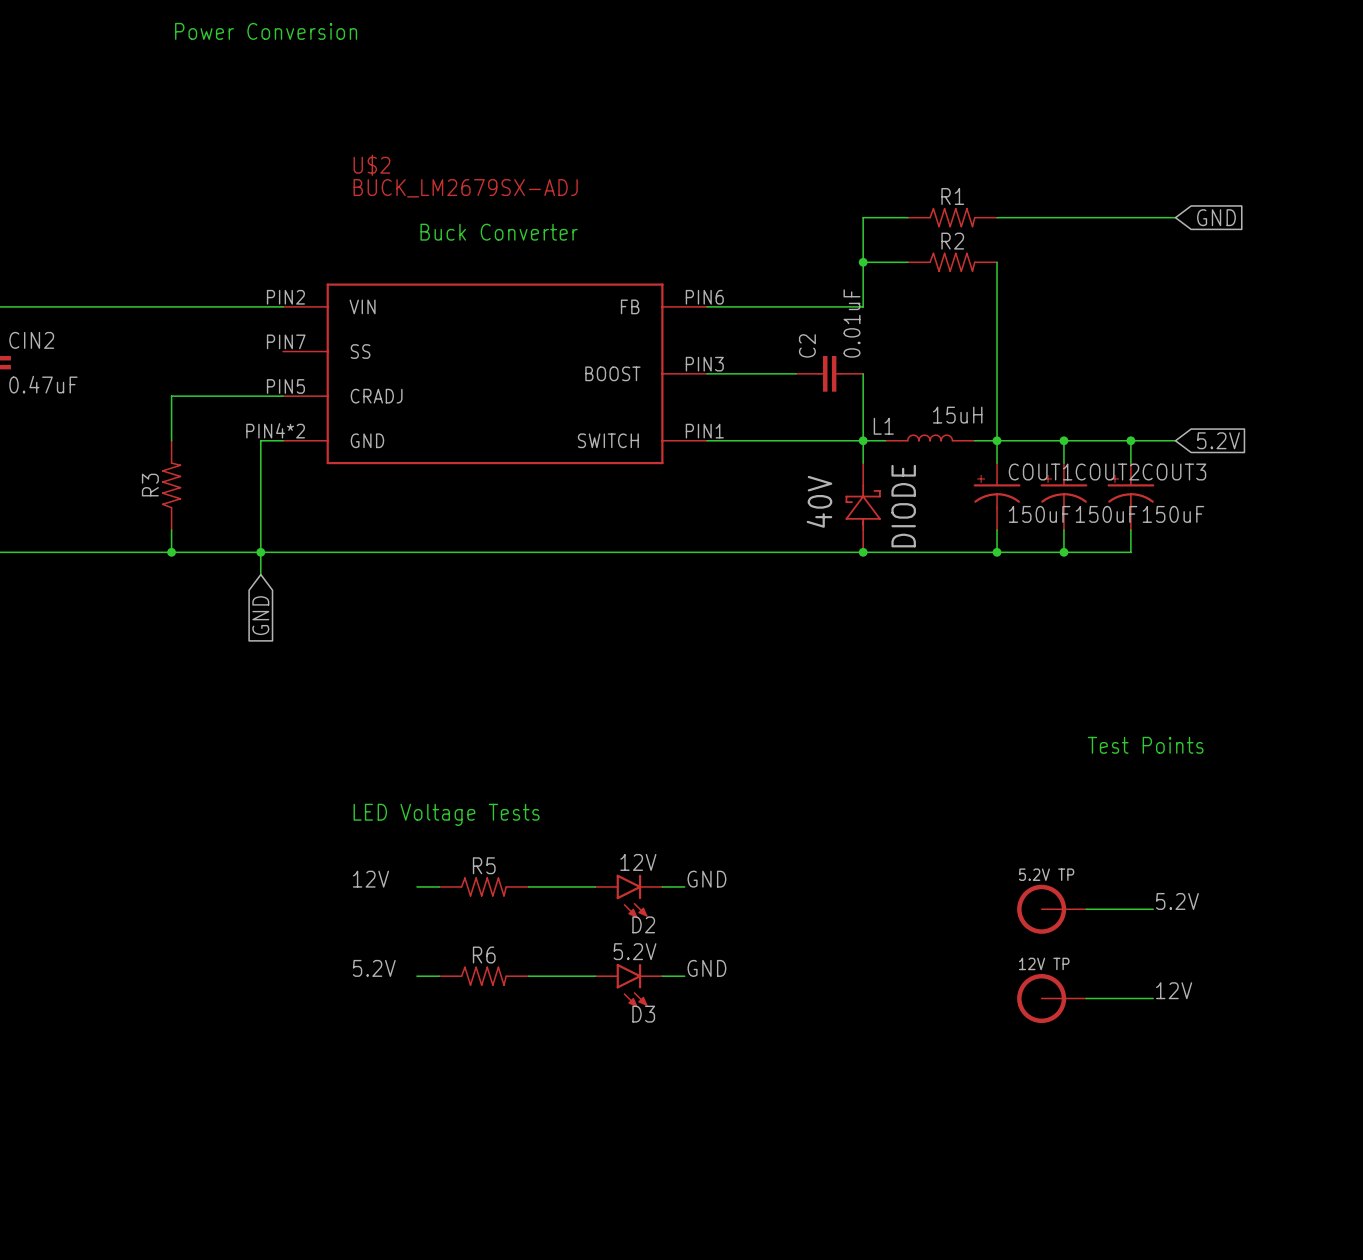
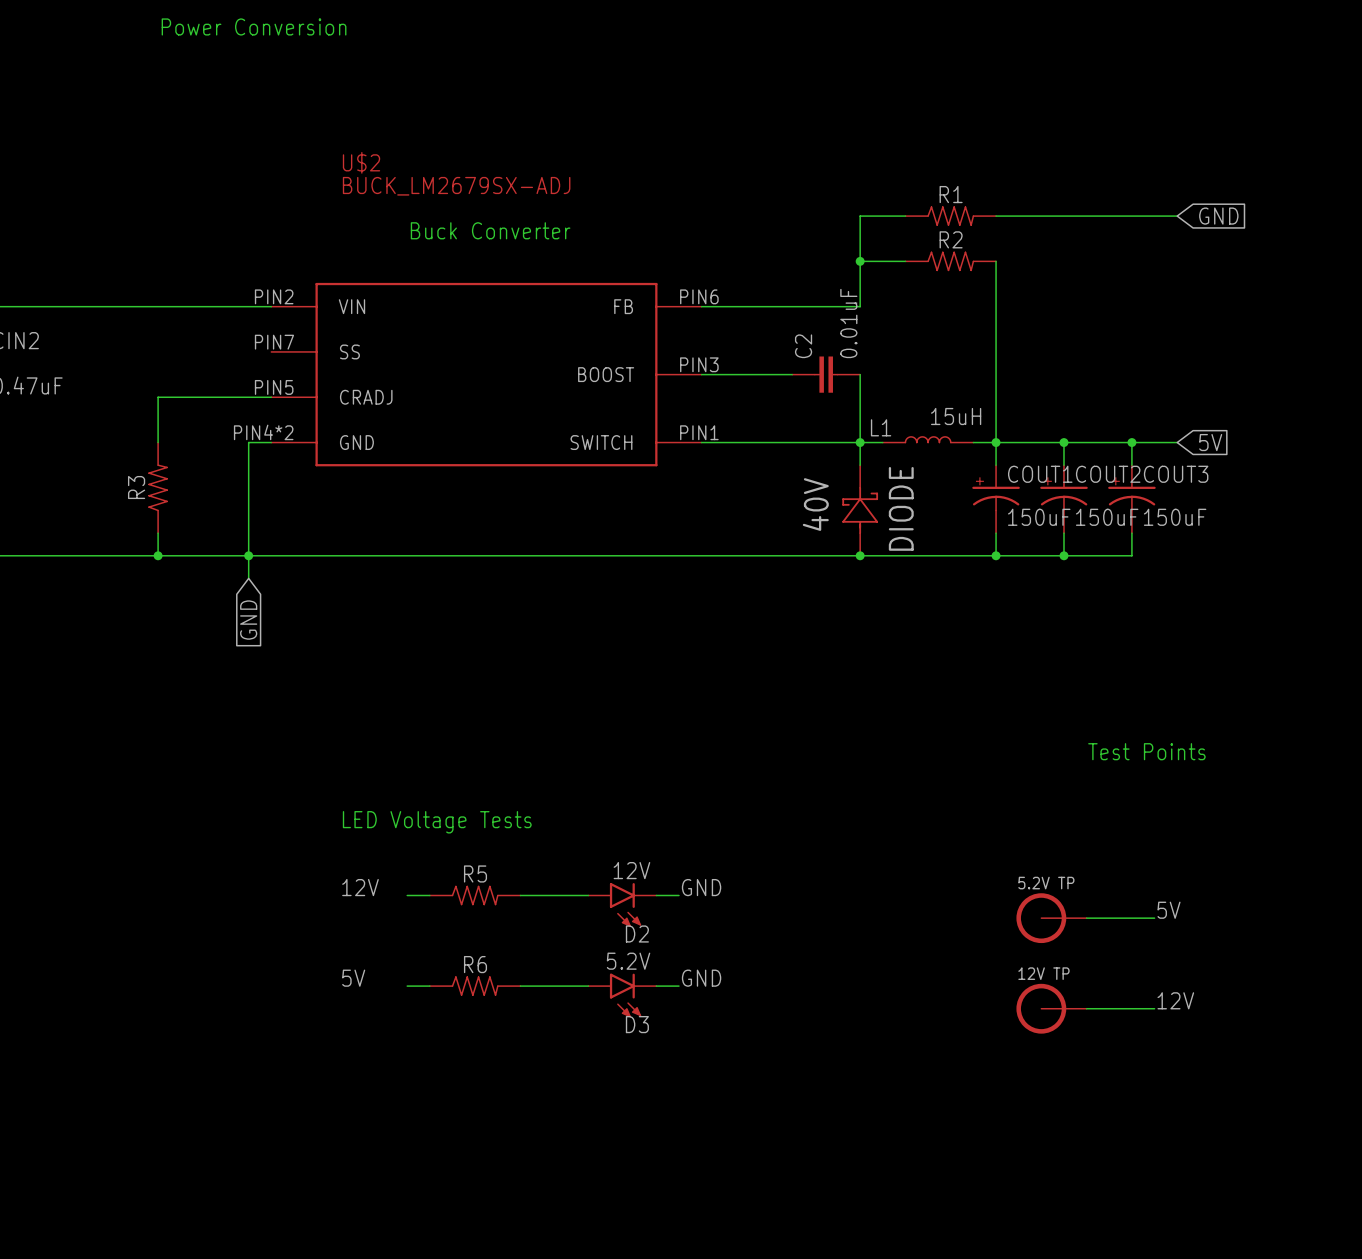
global label: 5.2V (1218, 440) -> 5V (1210, 442)
label: 5.2V (1177, 901) -> 5V (1169, 910)
label: 5.2V (374, 968) -> 5V (353, 978)

